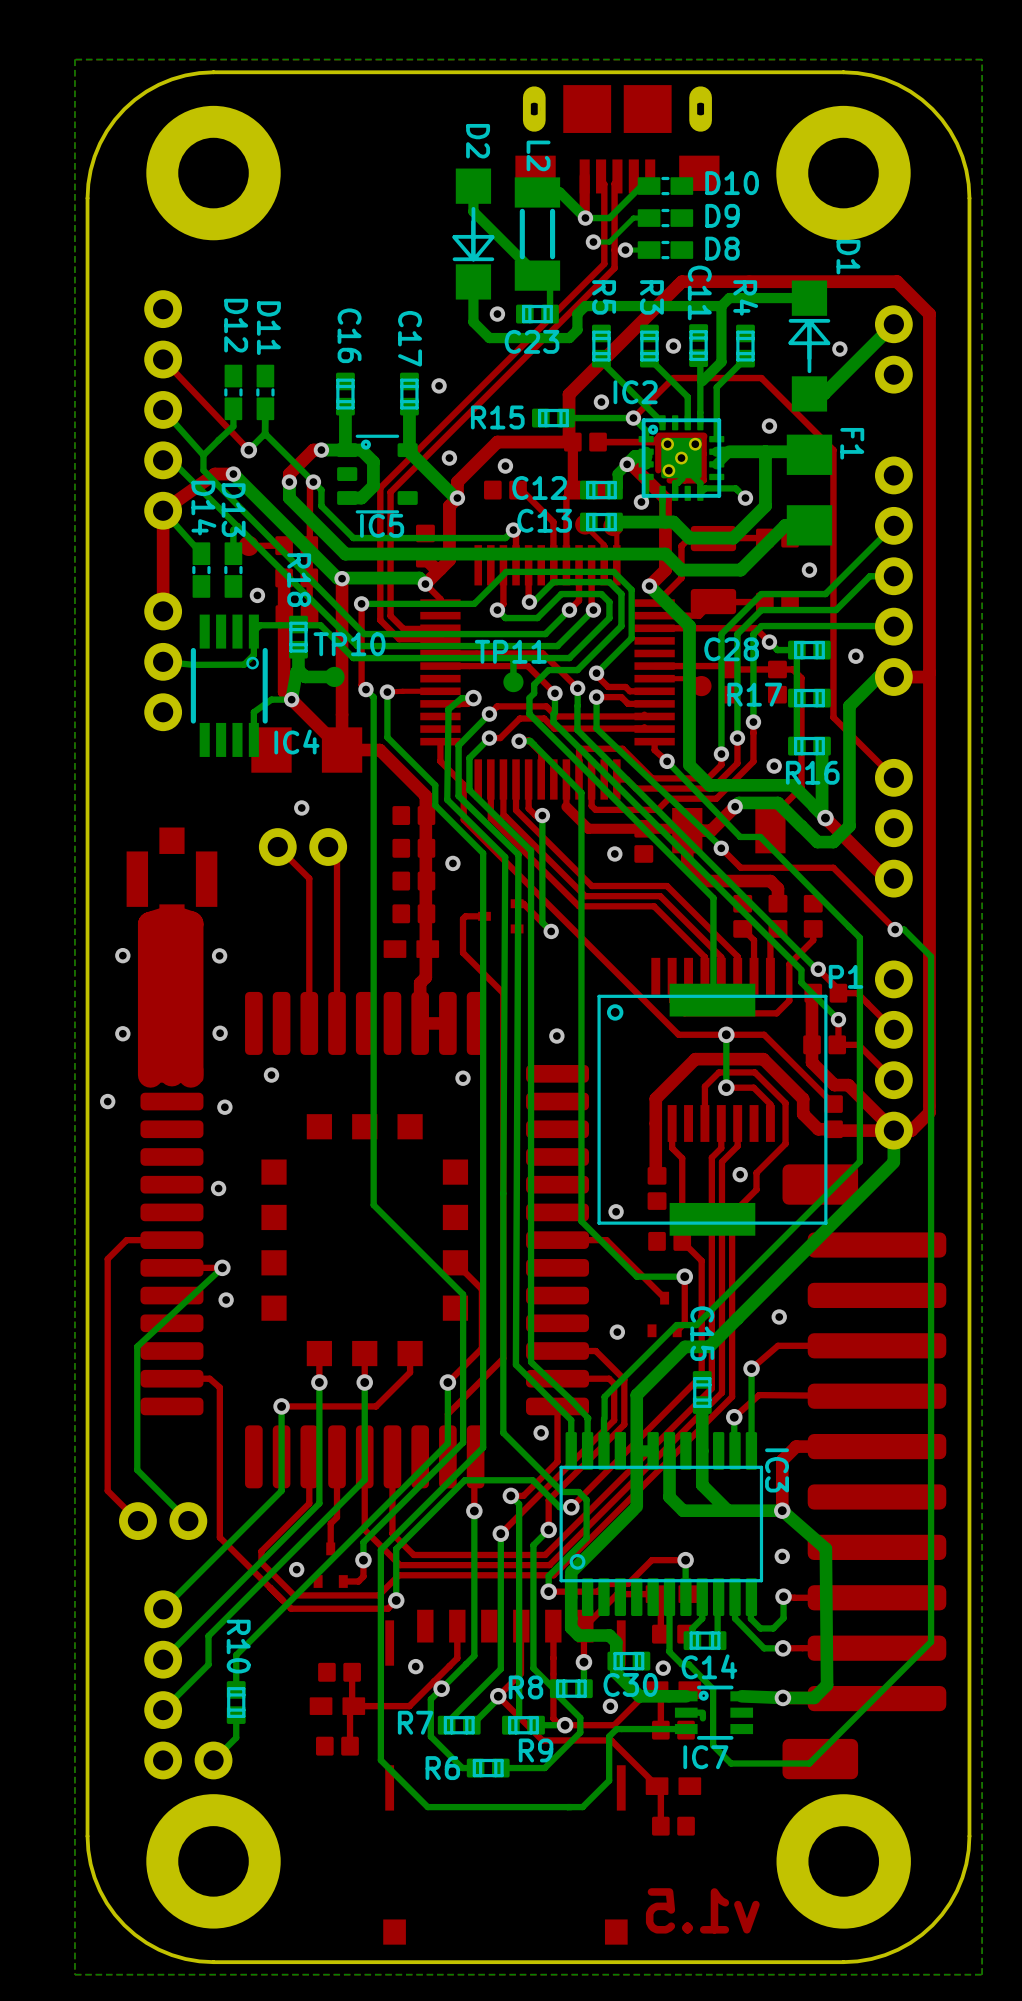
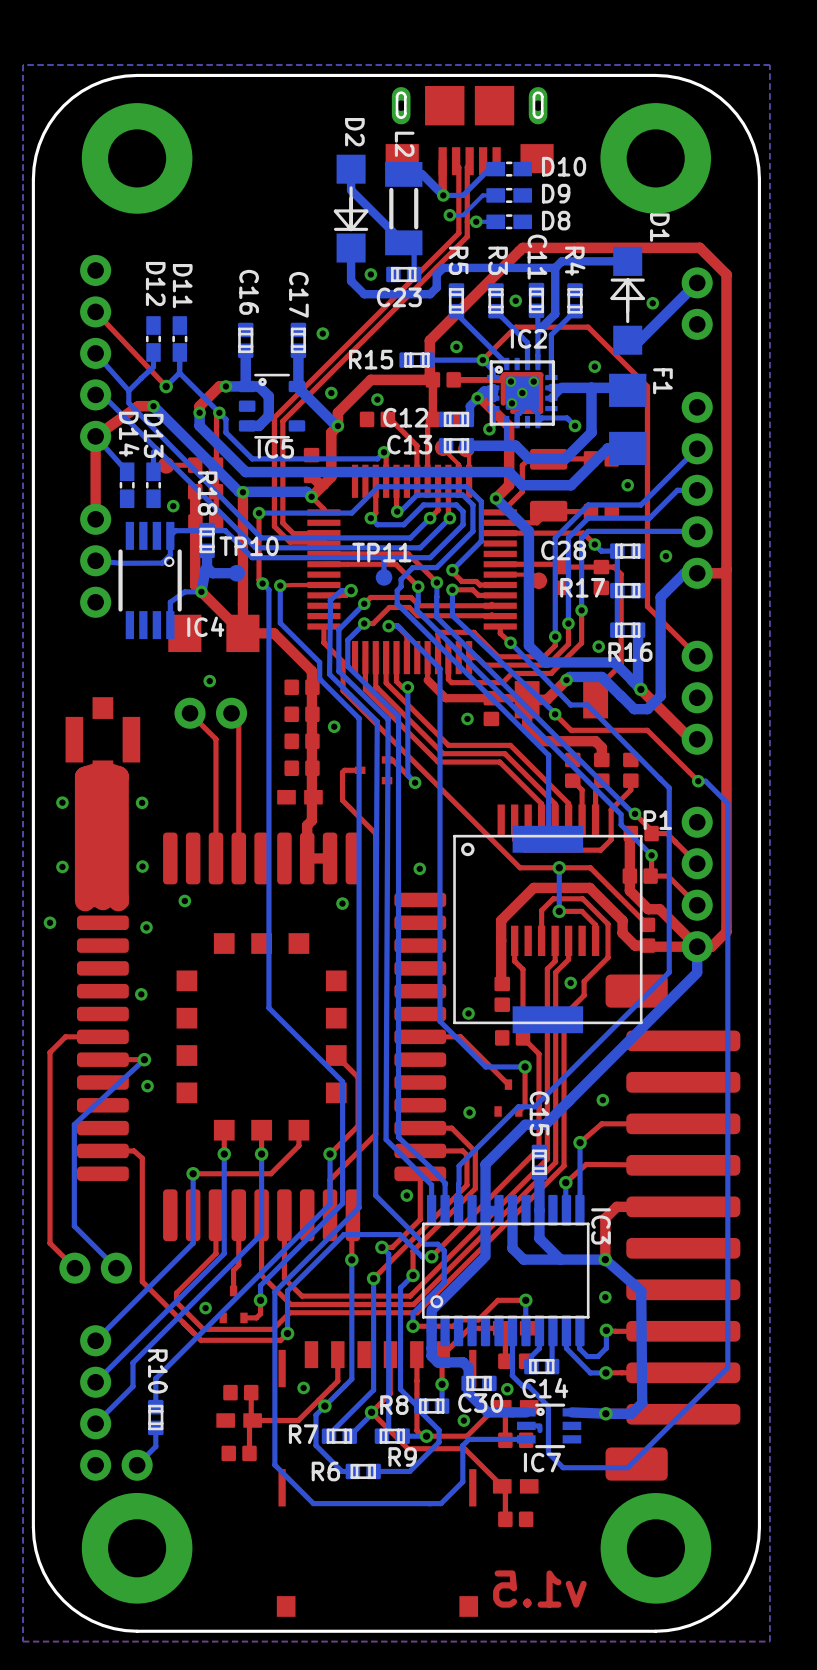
IC2 name position: IC2 (635, 392) -> IC2 (528, 338)

